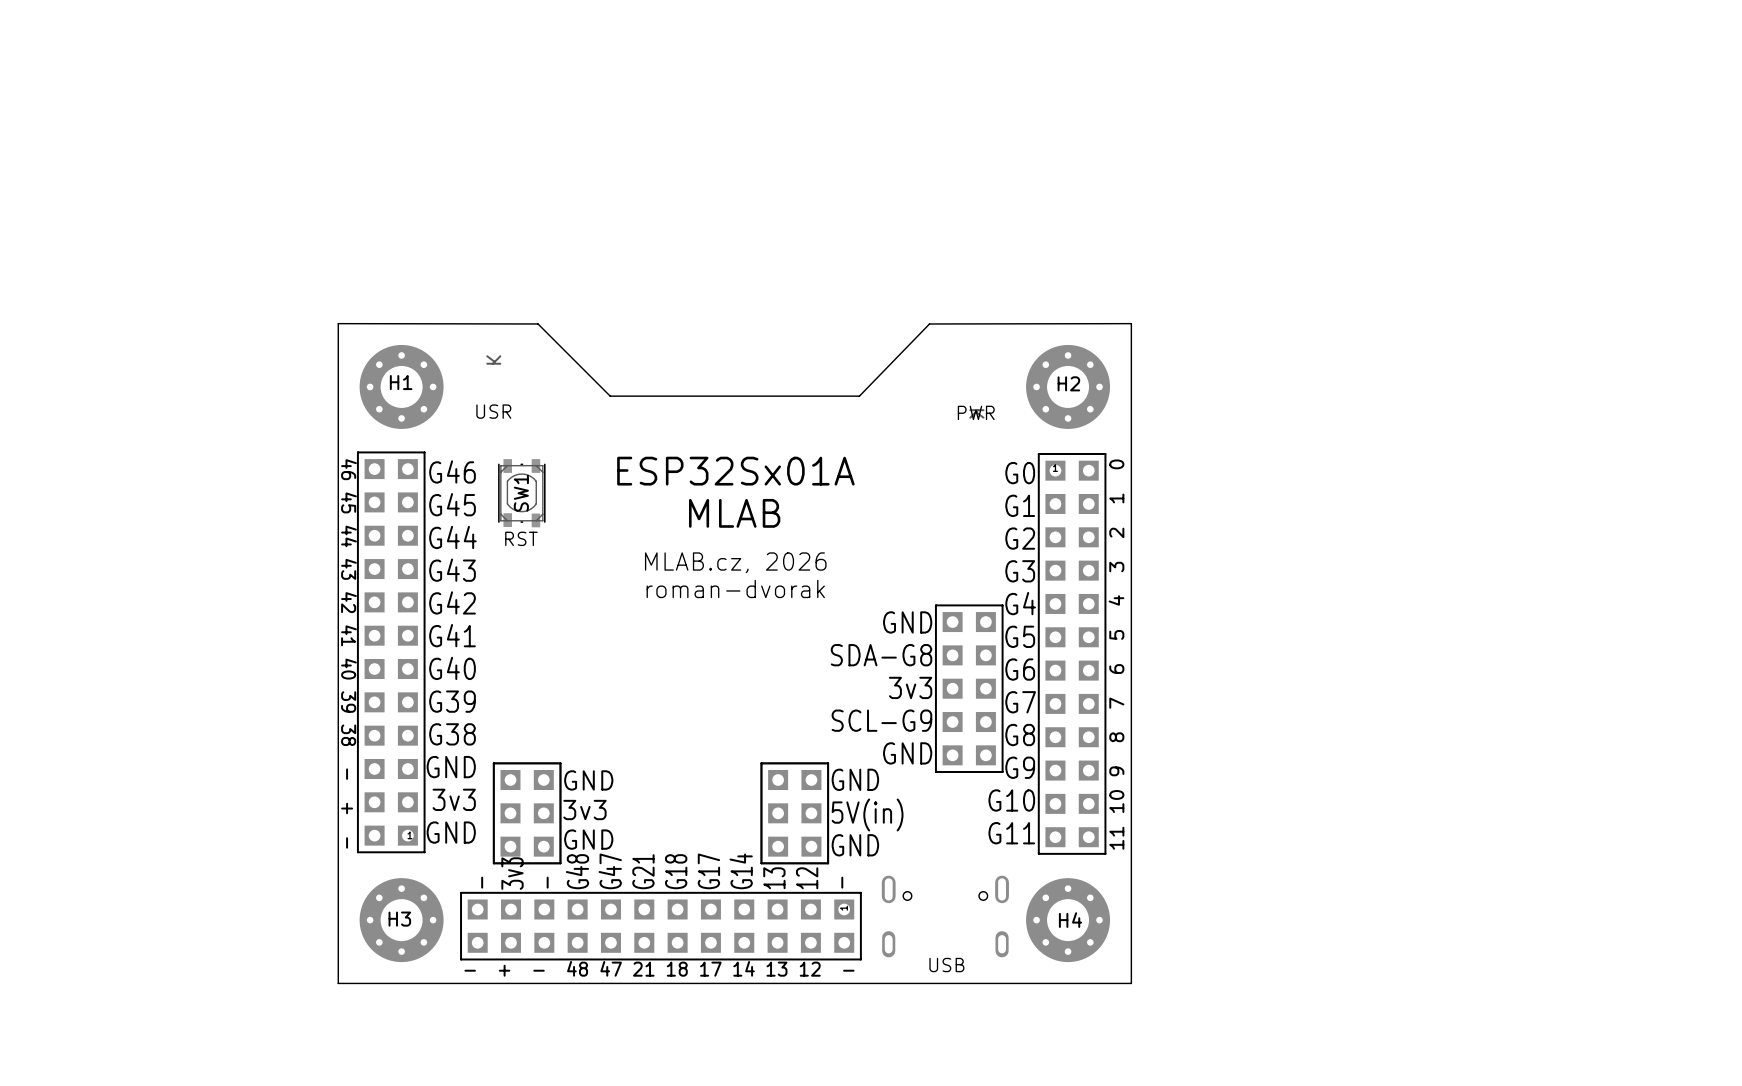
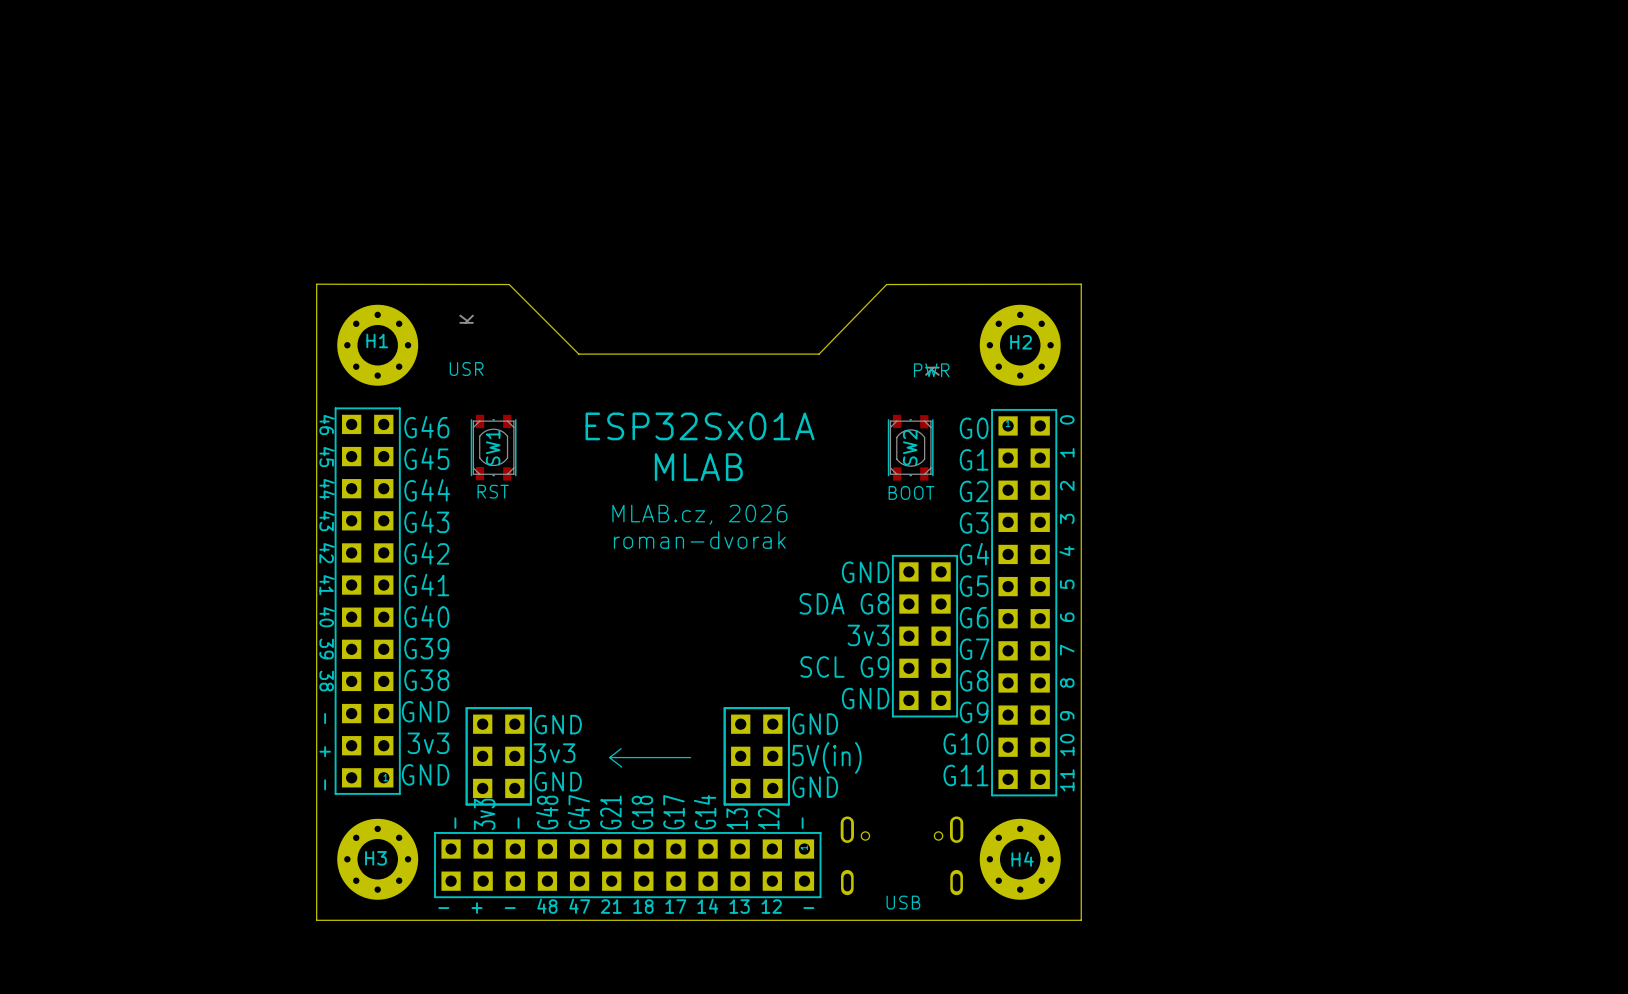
SW2: none -> (910, 447)
text: none -> BOOT (911, 492)
text: SDA-G8 (881, 655) -> SDA G8 (844, 603)
text: SCL-G9 (881, 720) -> SCL G9 (844, 666)
line: none -> (621, 748) (609, 757) (690, 757)
line: none -> (610, 758) (621, 767)

